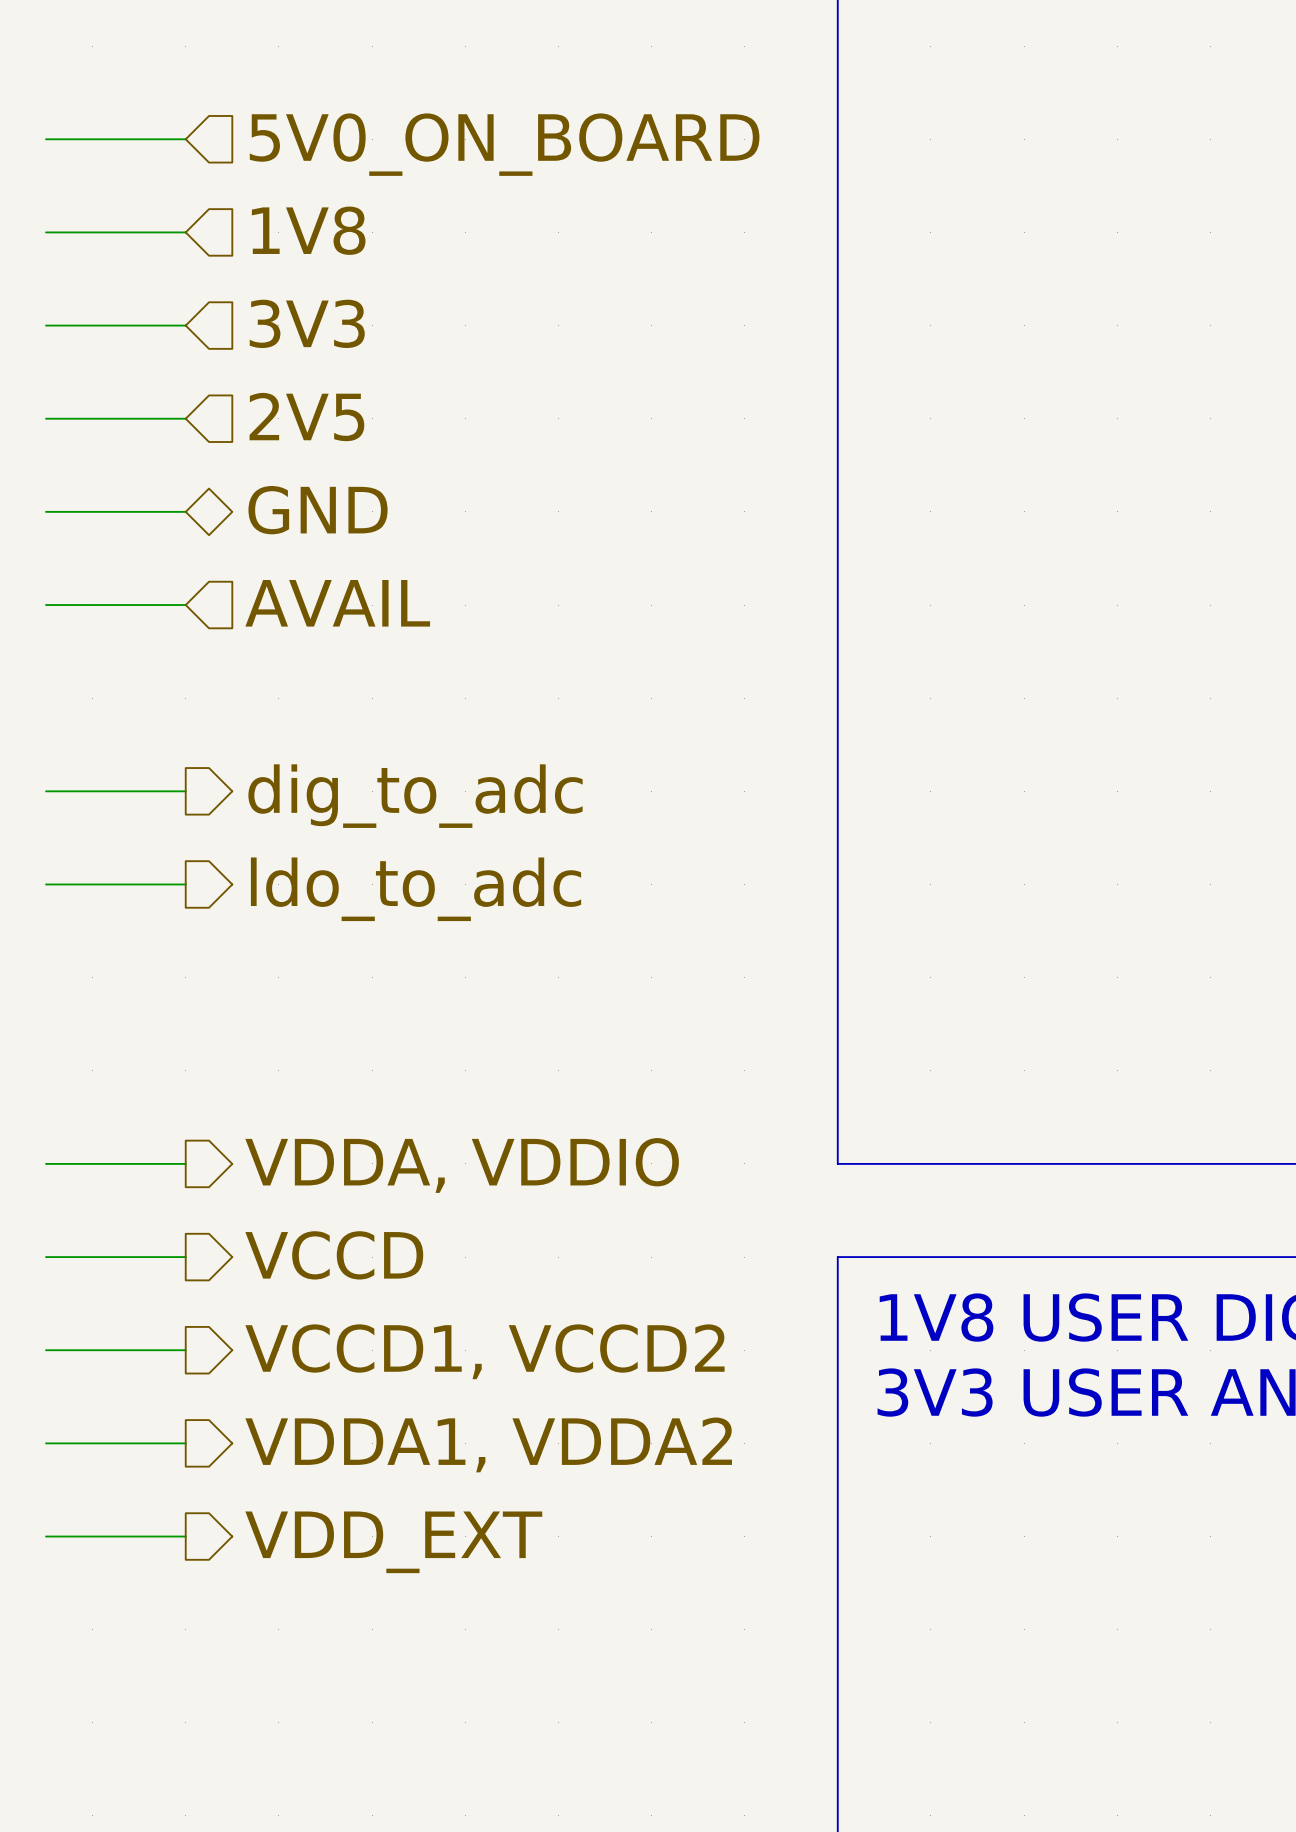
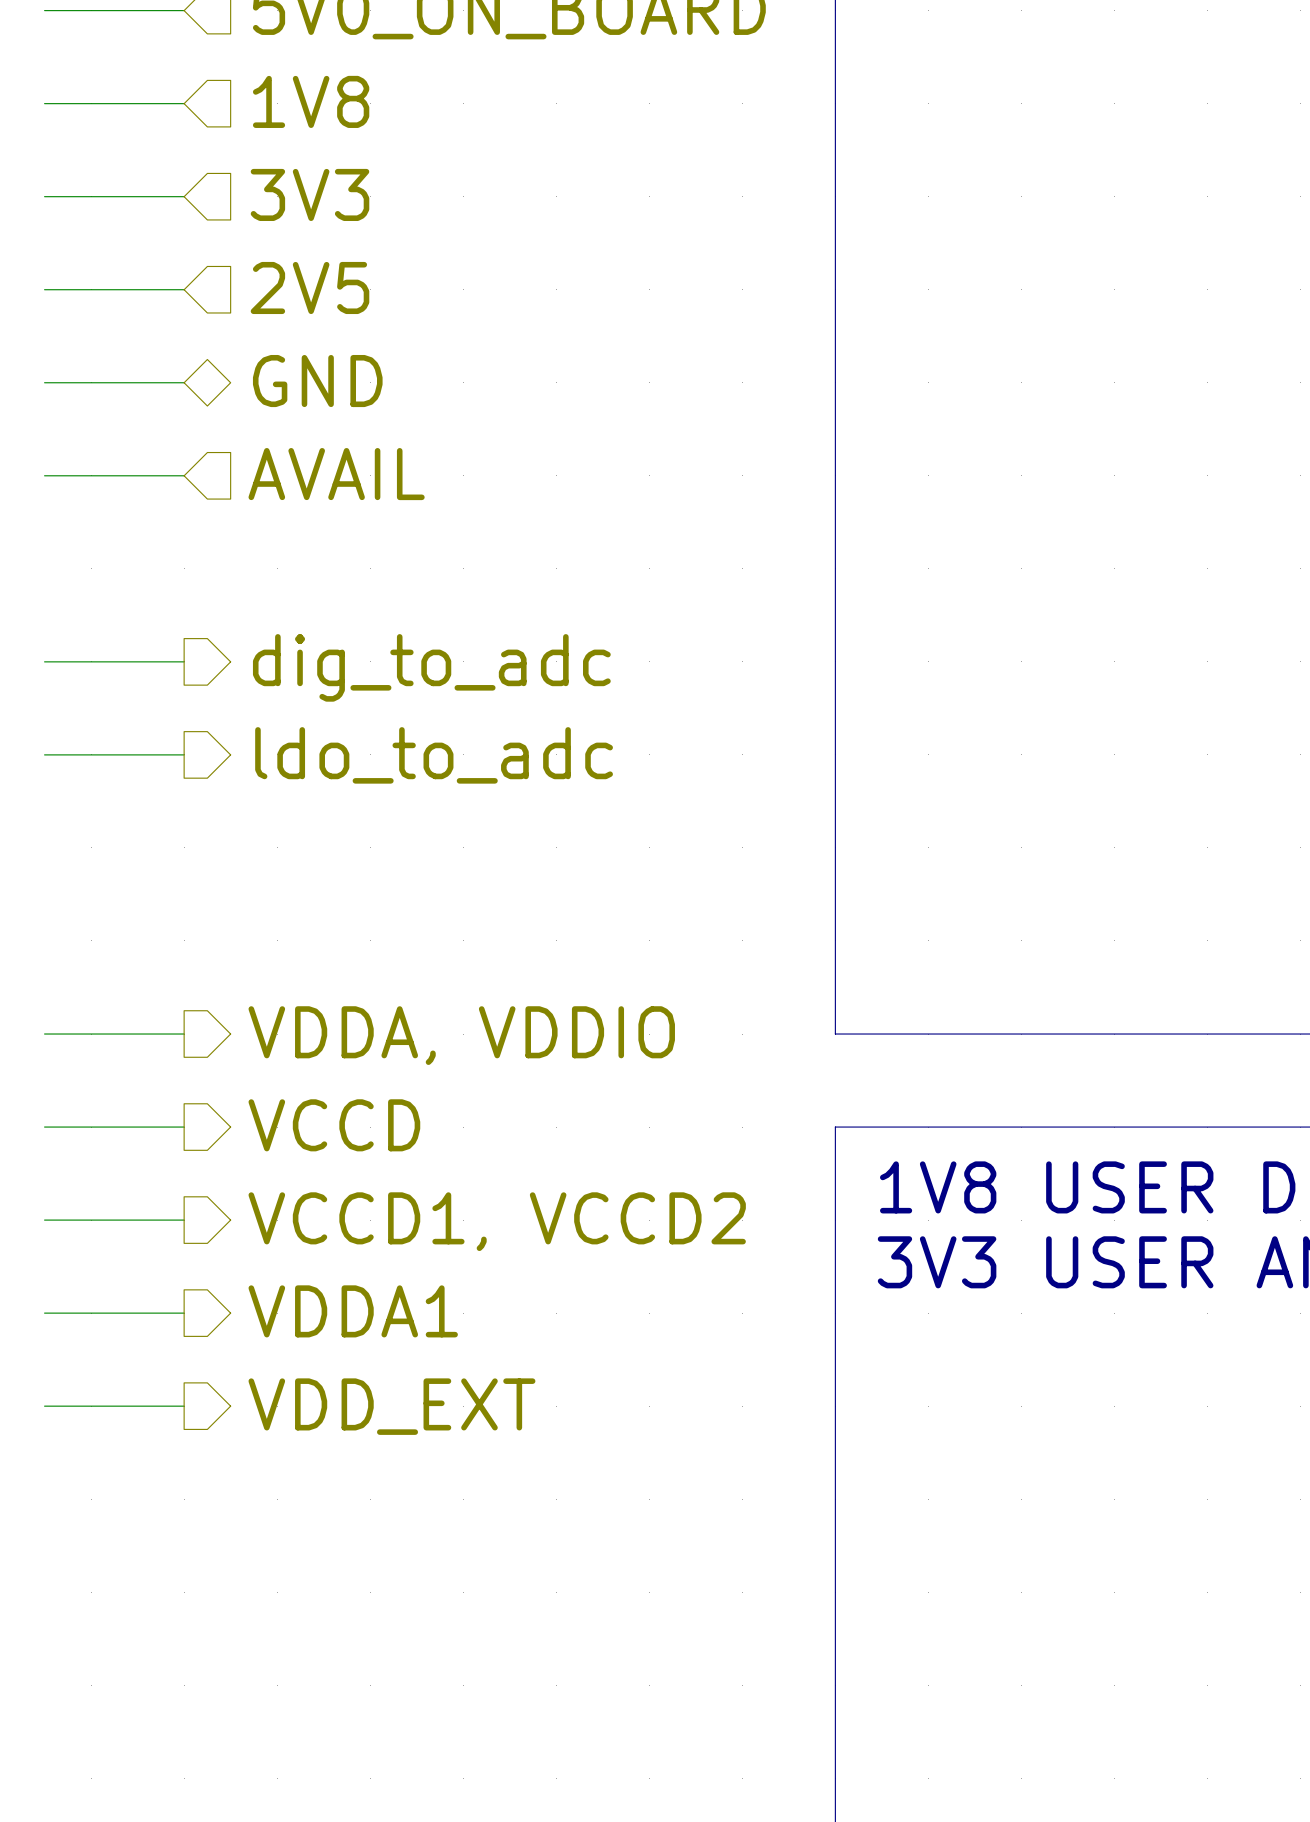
hierarchical label: VDDA1, VDDA2 (488, 1444) -> VDDA1 (353, 1311)

